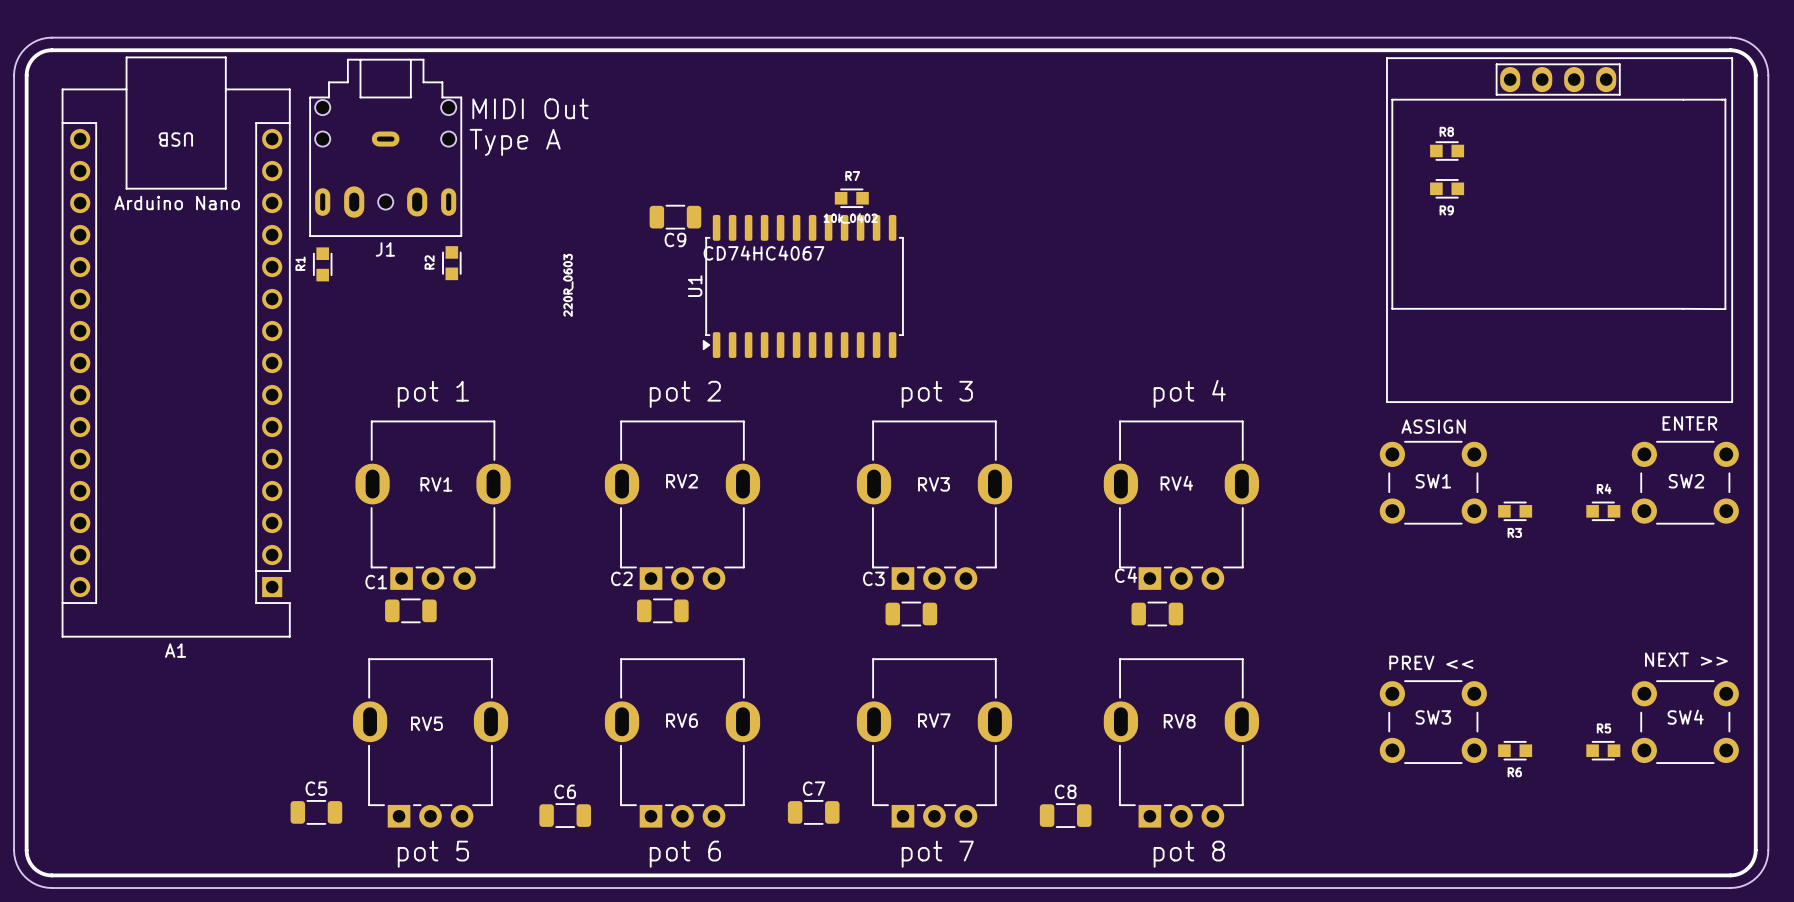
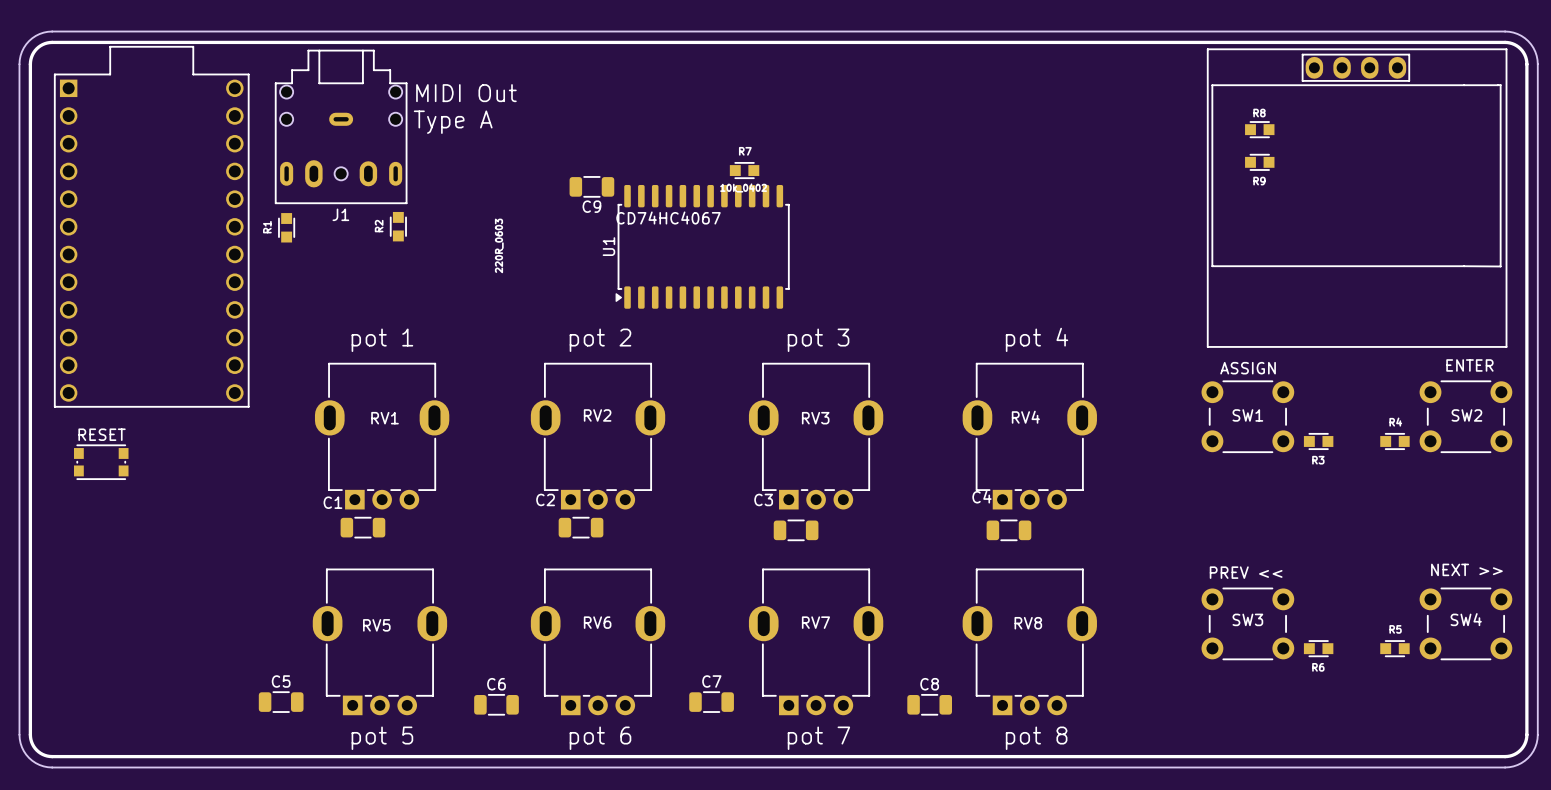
text: Arduino Nano (177, 203) -> none
part: none -> (151, 226)
A1: (176, 347) -> none
part: none -> RESET (101, 462)

